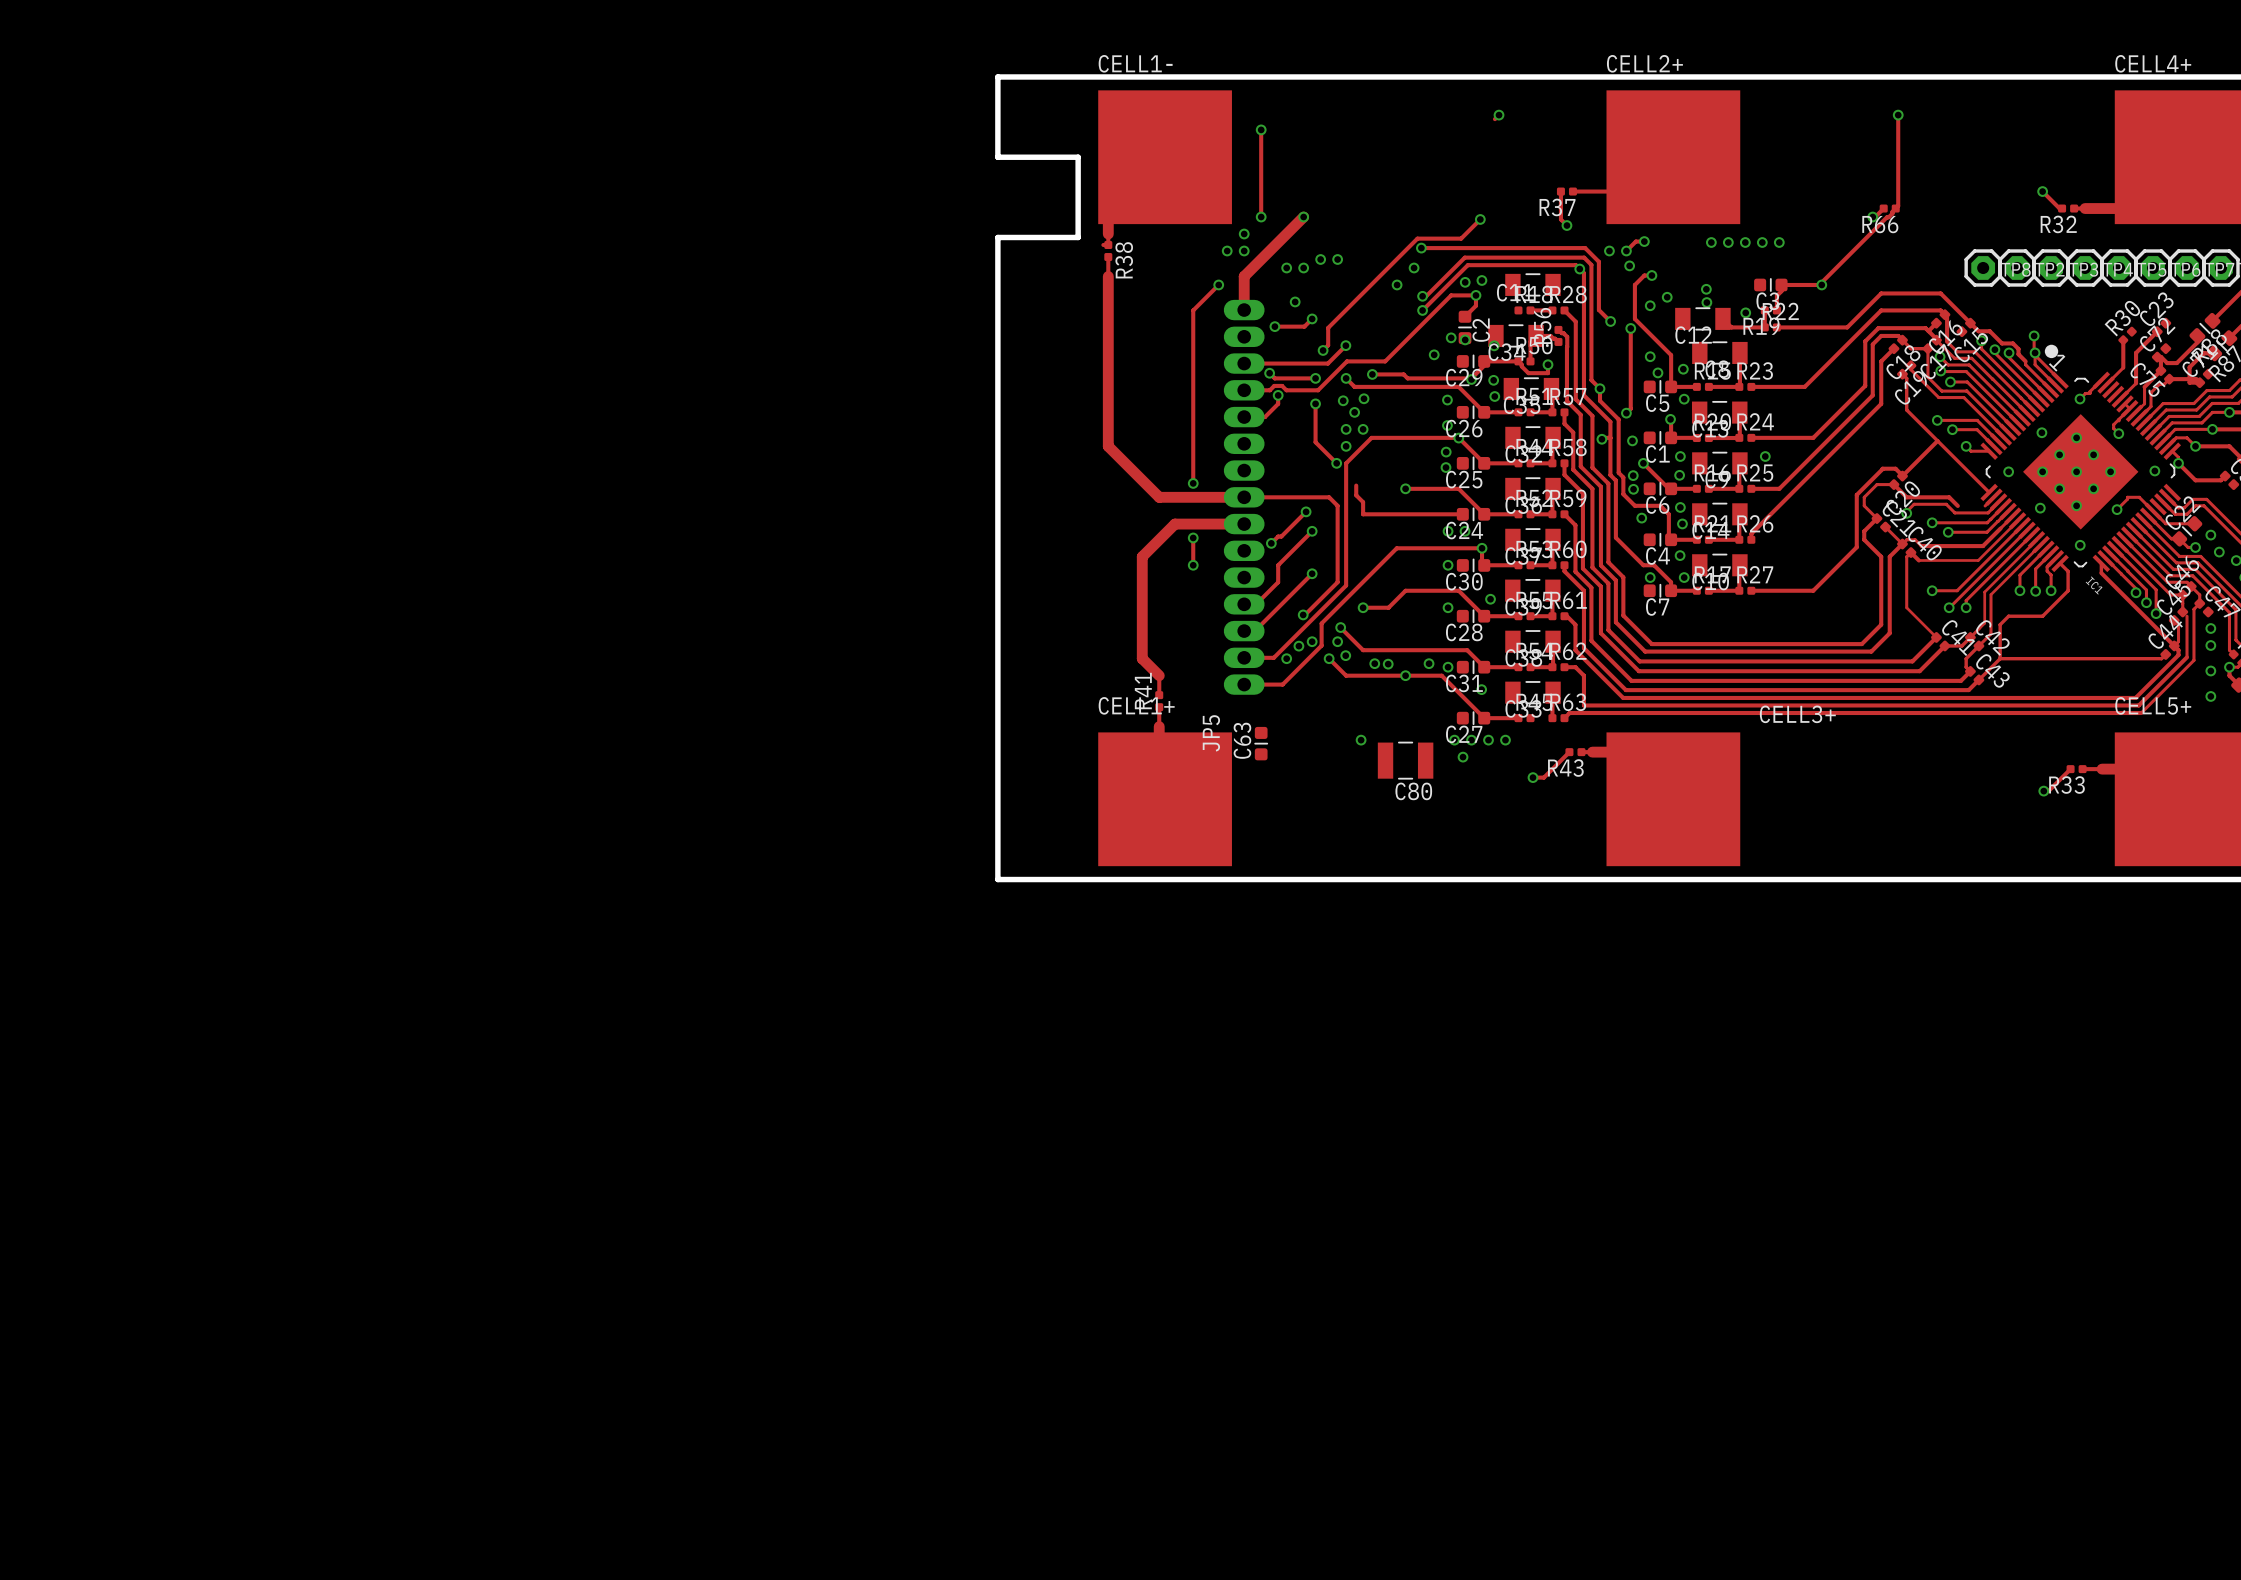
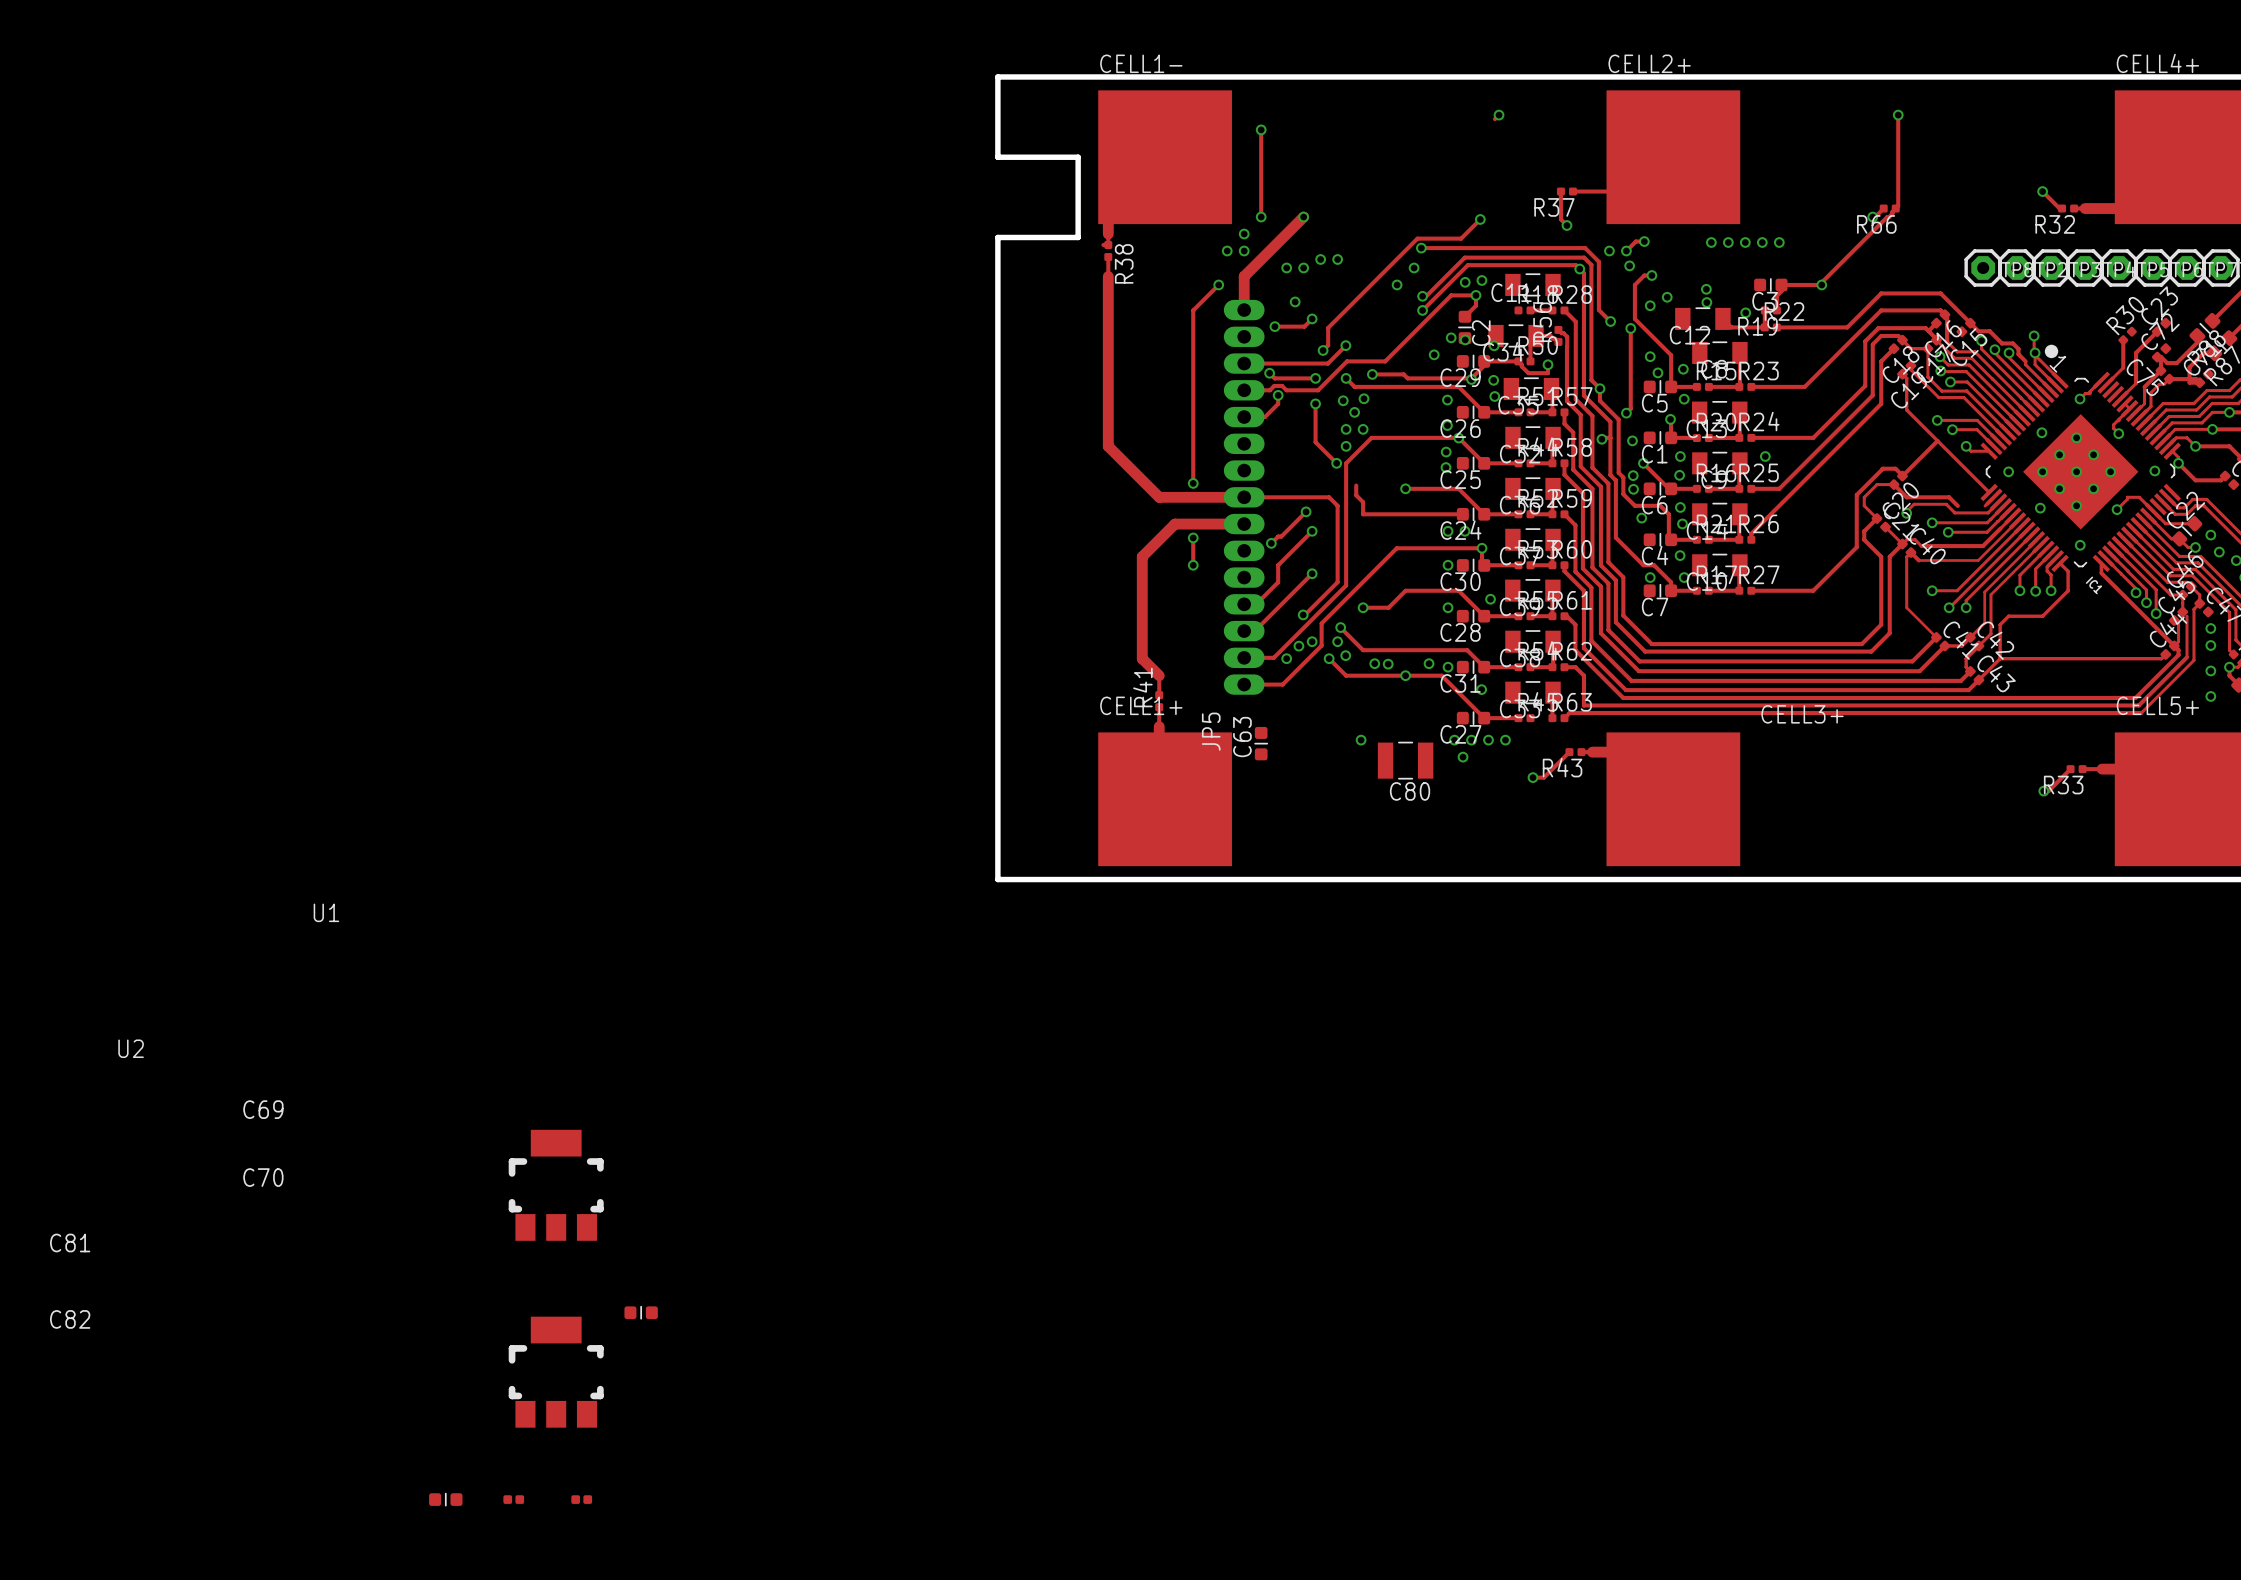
U1: none -> (556, 1185)
C81: none -> (641, 1312)
U2: none -> (556, 1372)
C82: none -> (445, 1499)
C69: none -> (513, 1499)
C70: none -> (581, 1499)

